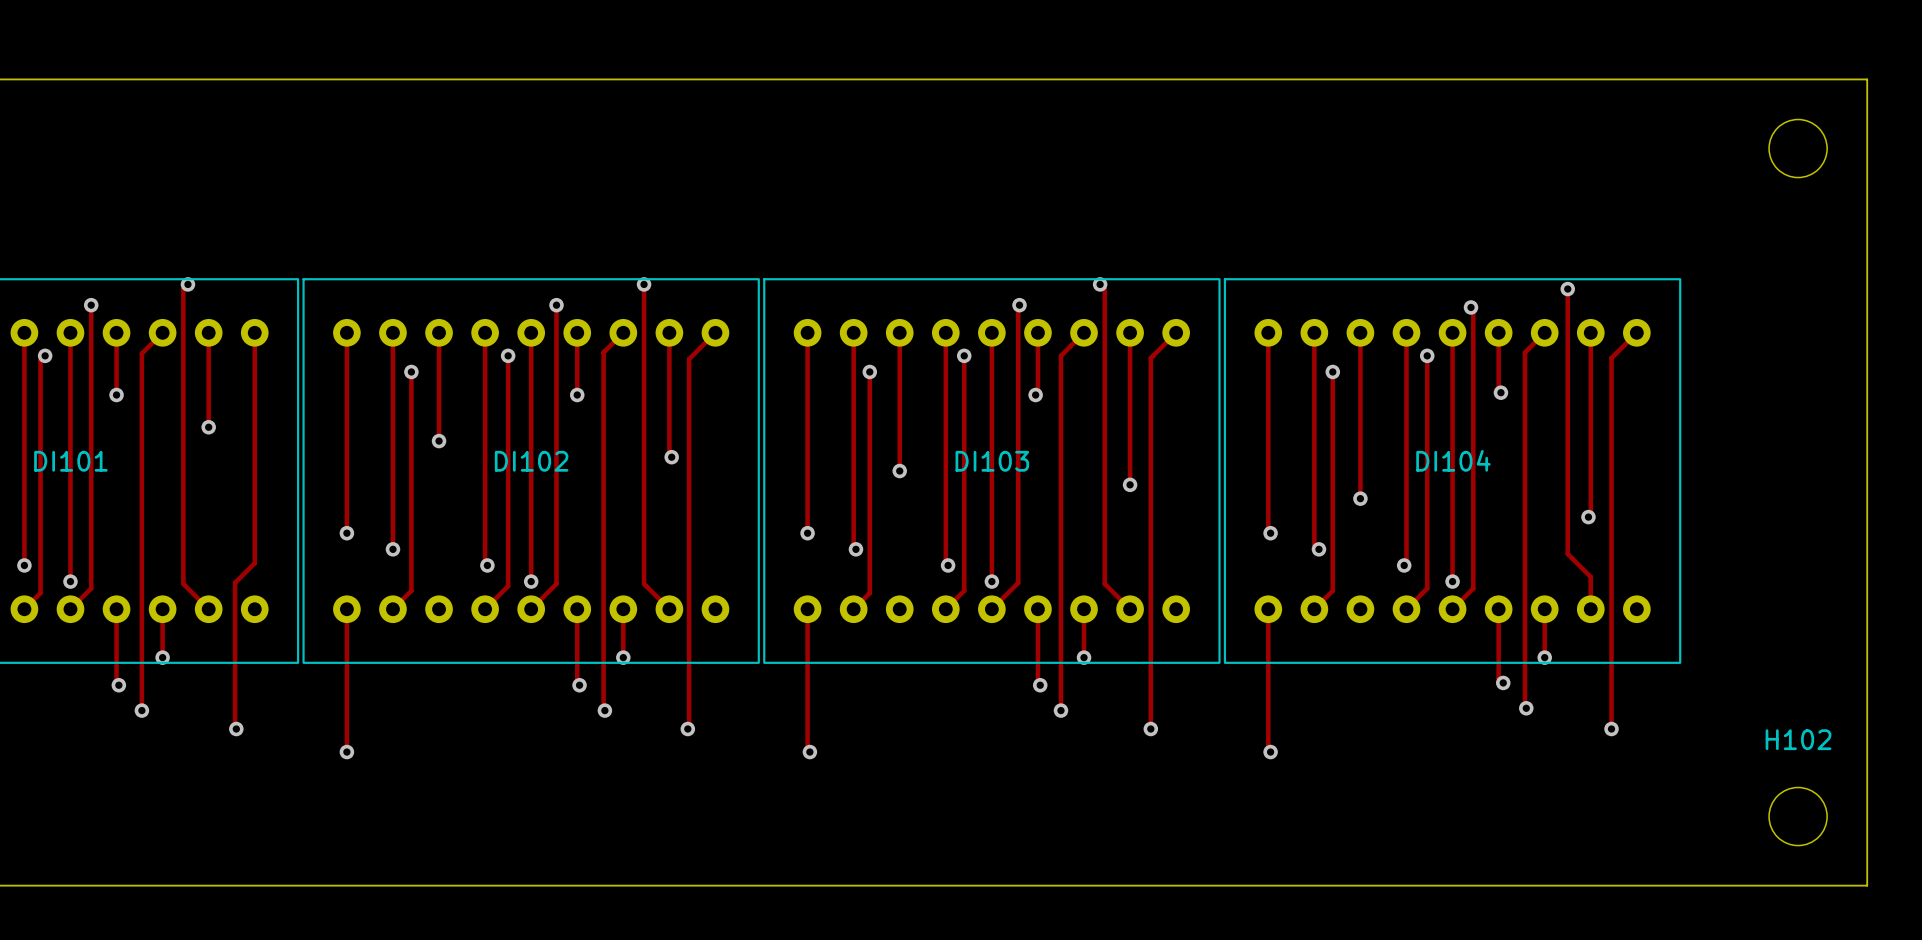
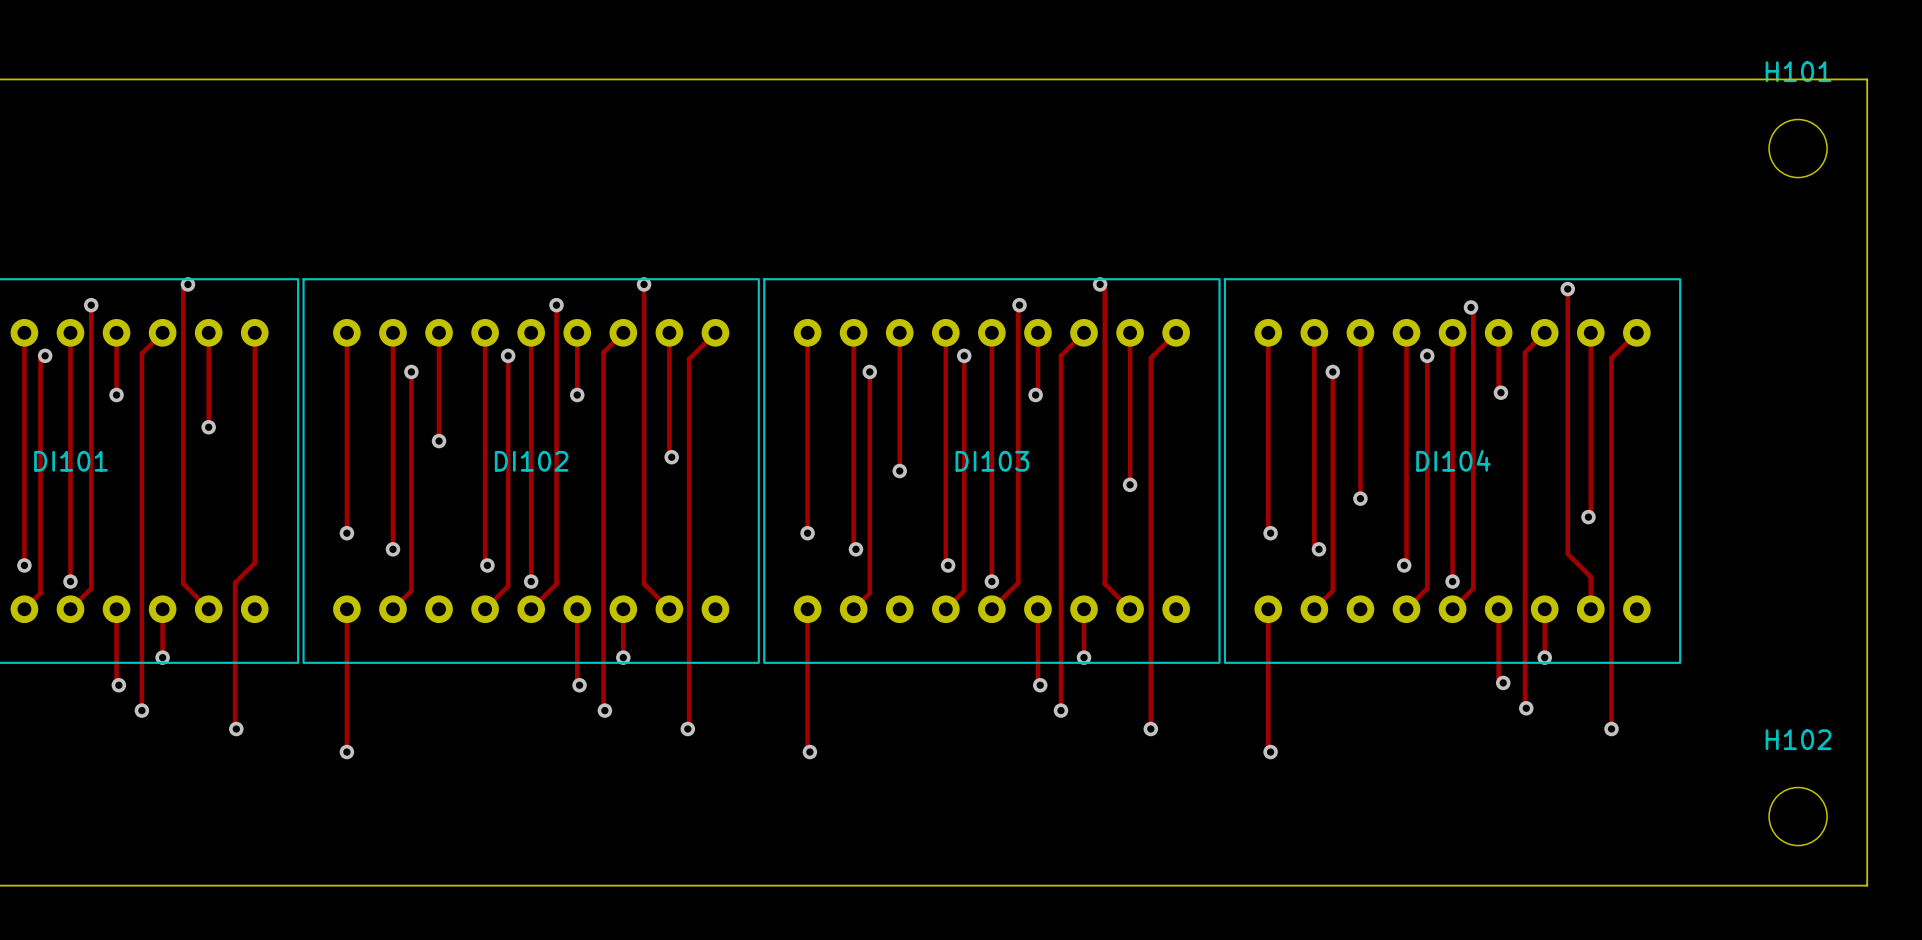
H101 name: none -> H101 (1798, 71)

